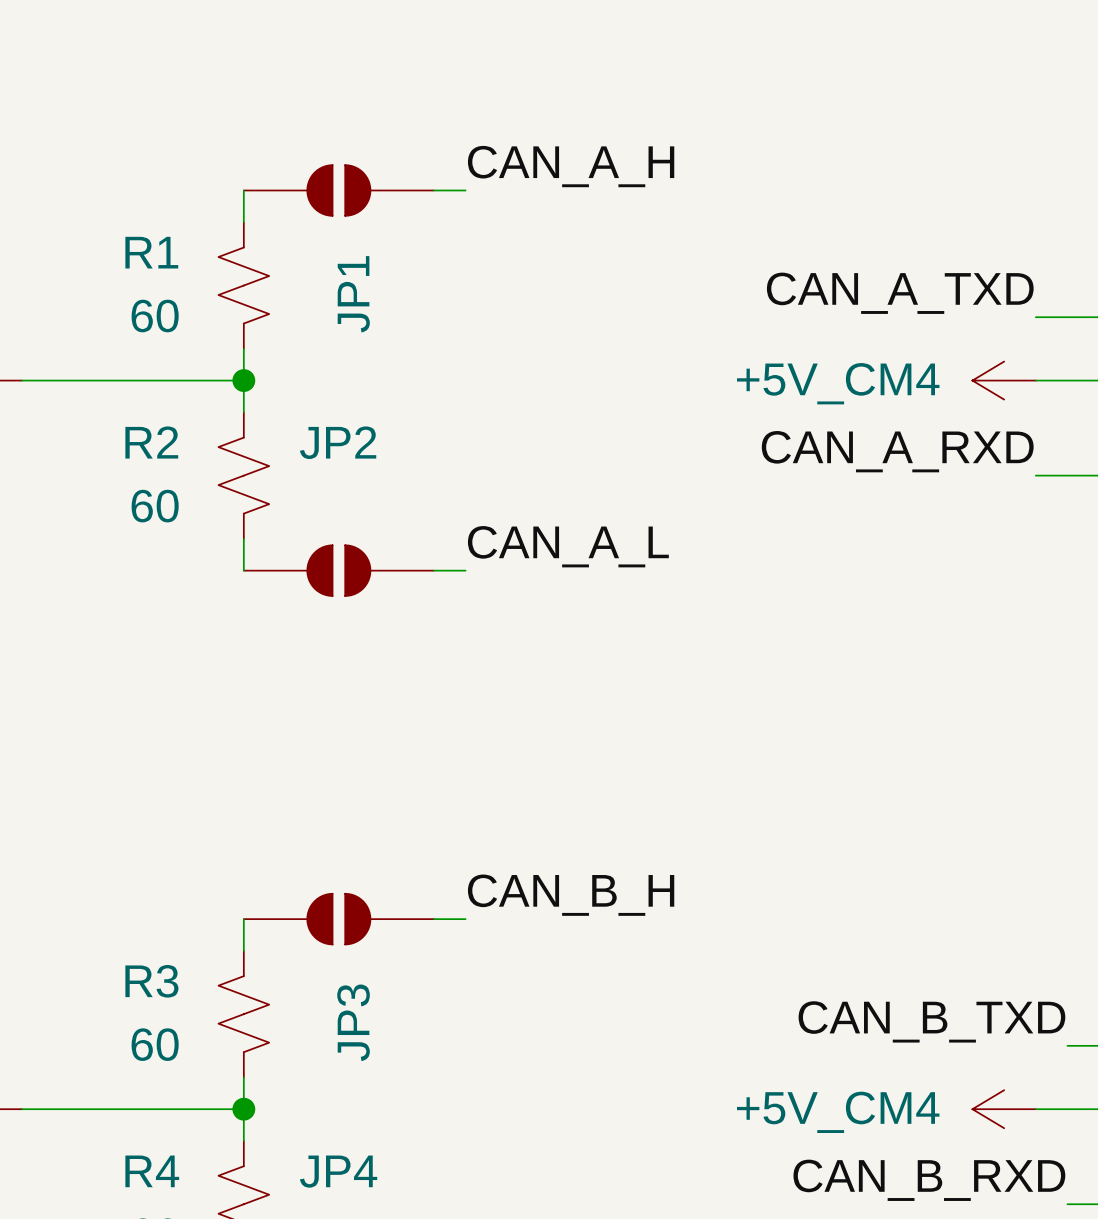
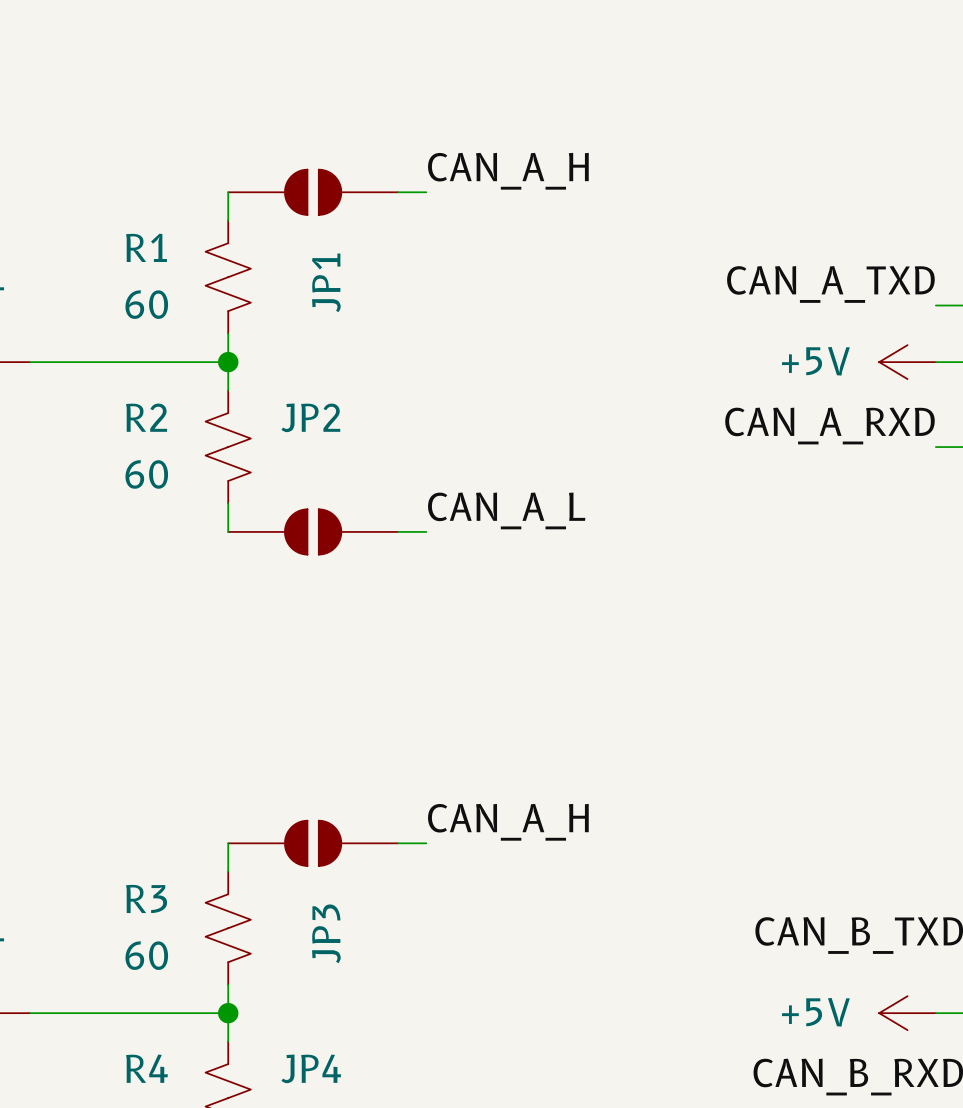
power symbol: +5V_CM4 (1004, 380) -> +5V (907, 362)
label: CAN_B_H (571, 895) -> CAN_A_H (508, 822)
power symbol: +5V_CM4 (1004, 1109) -> +5V (907, 1013)

